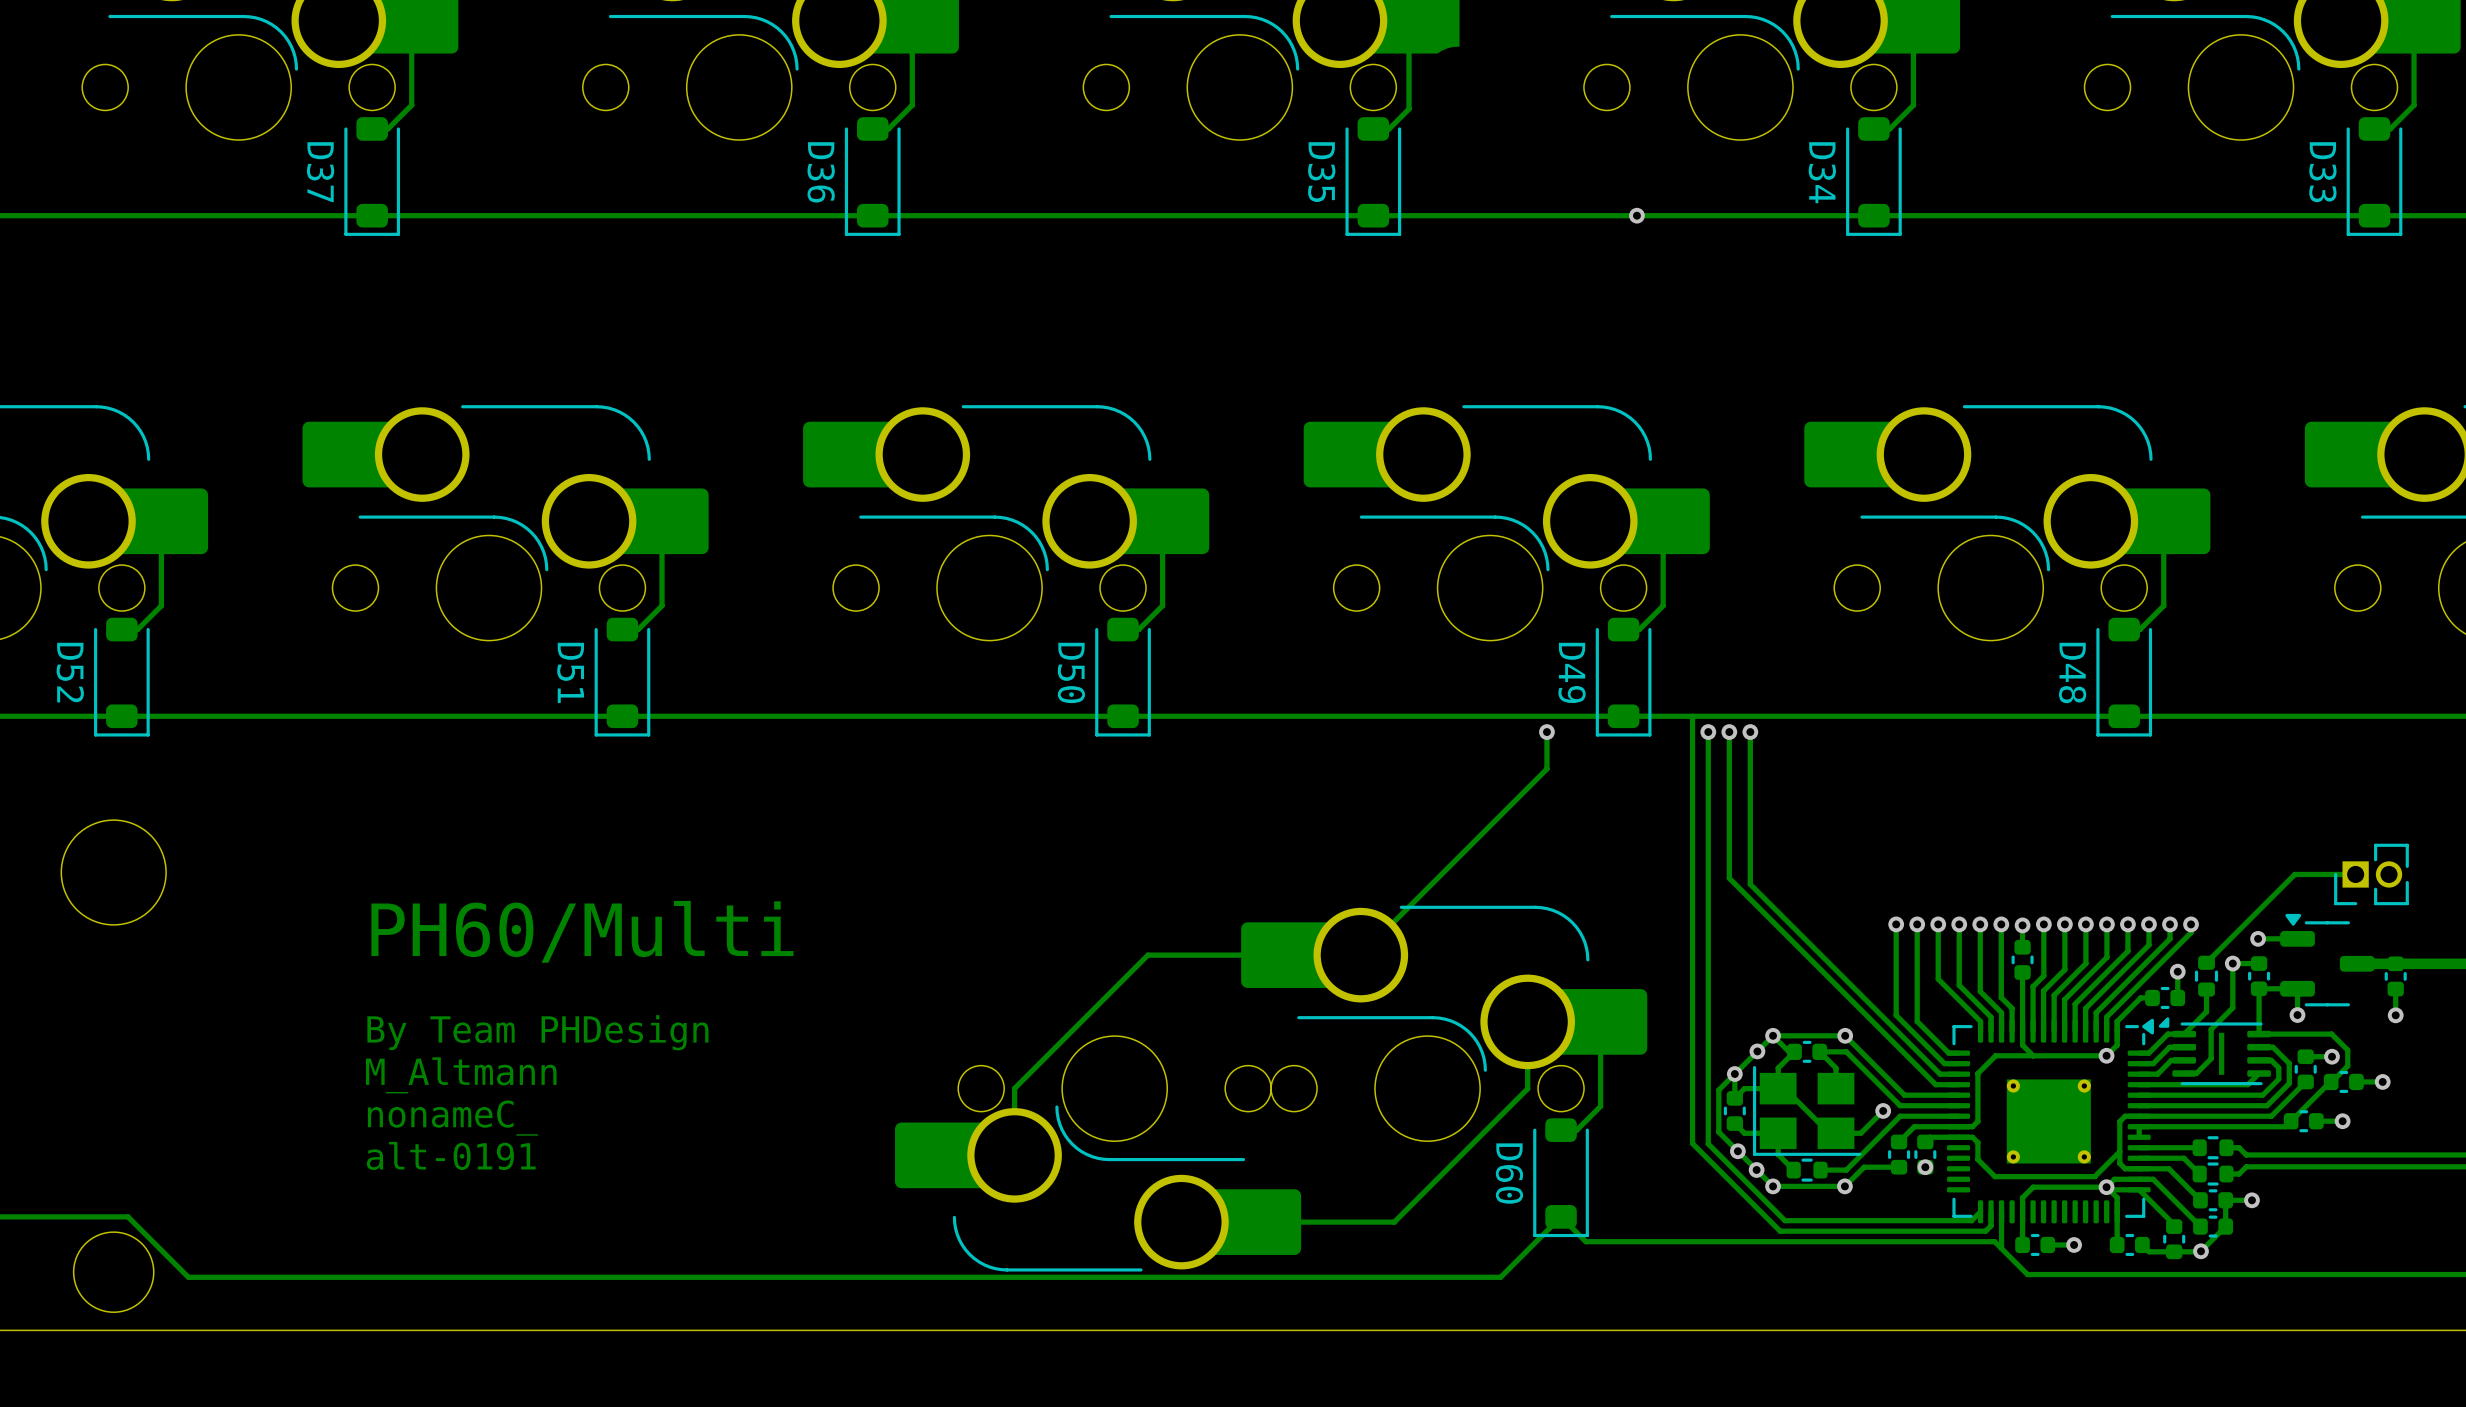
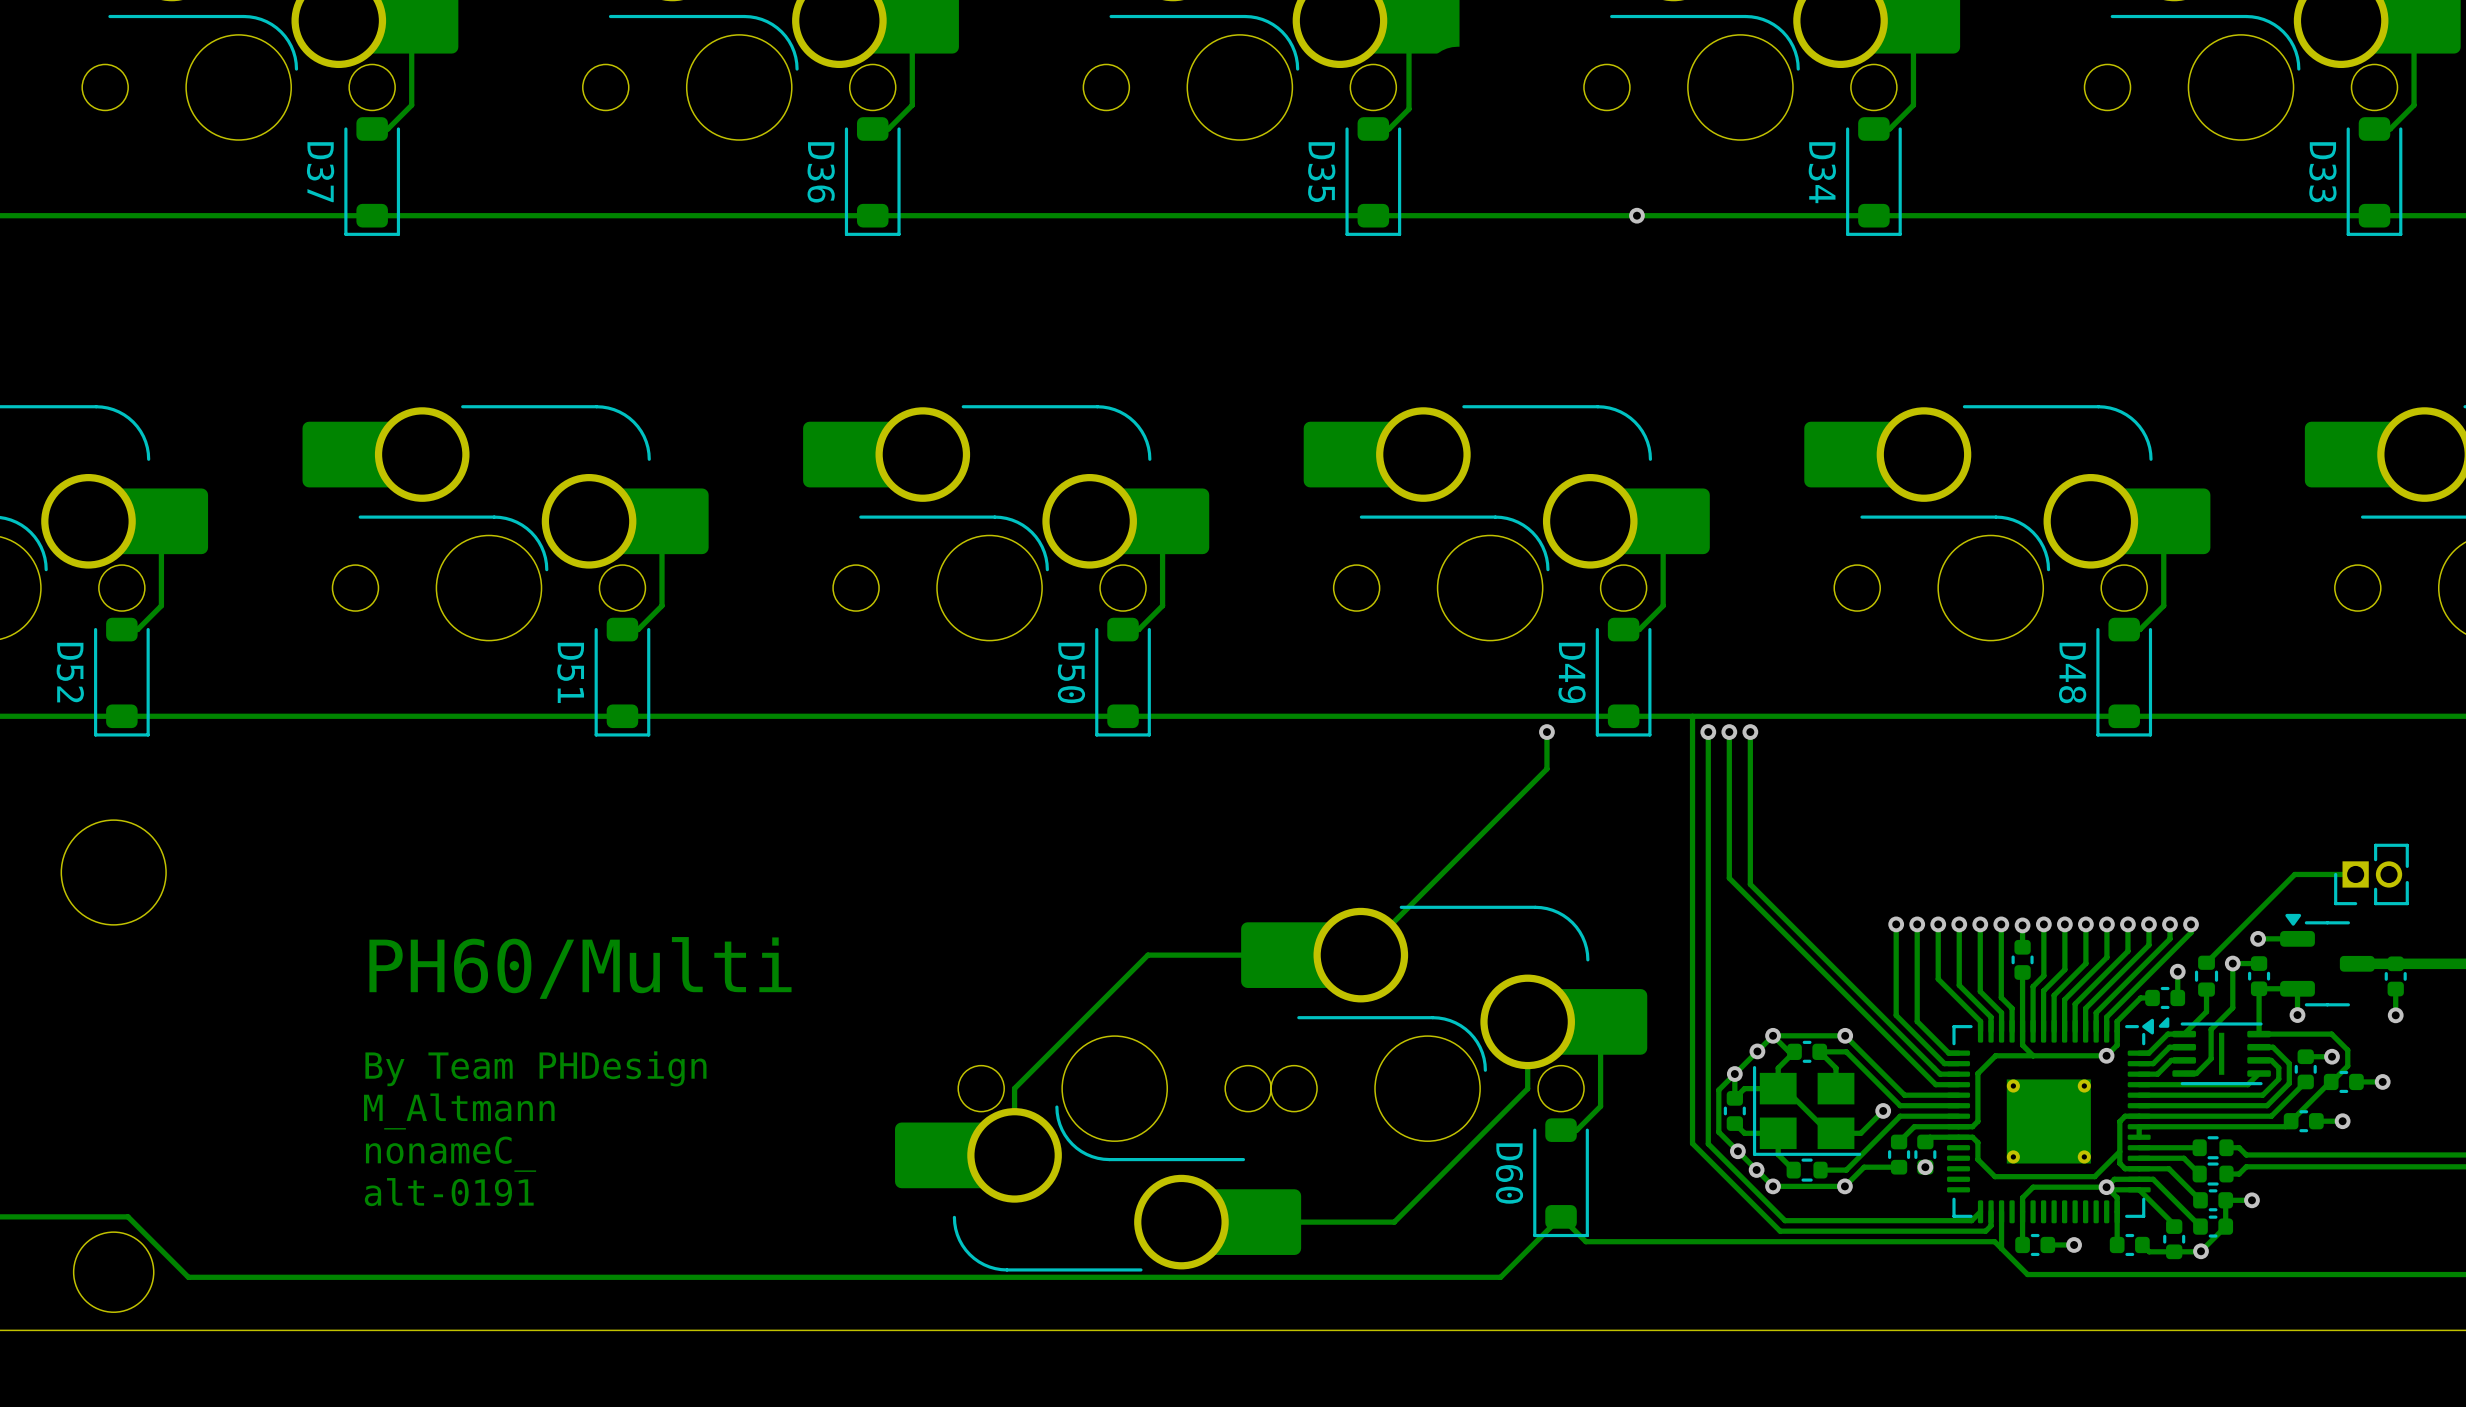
text position: PH60/Multi (582, 931) -> PH60/Multi (580, 967)
text position: By Team PHDesign (537, 1032) -> By Team PHDesign (535, 1068)
text position: M_Altmann (461, 1075) -> M_Altmann (459, 1111)
text position: nonameC_ (452, 1118) -> nonameC_ (451, 1154)
text position: alt-0191 (451, 1155) -> alt-0191 (449, 1192)

